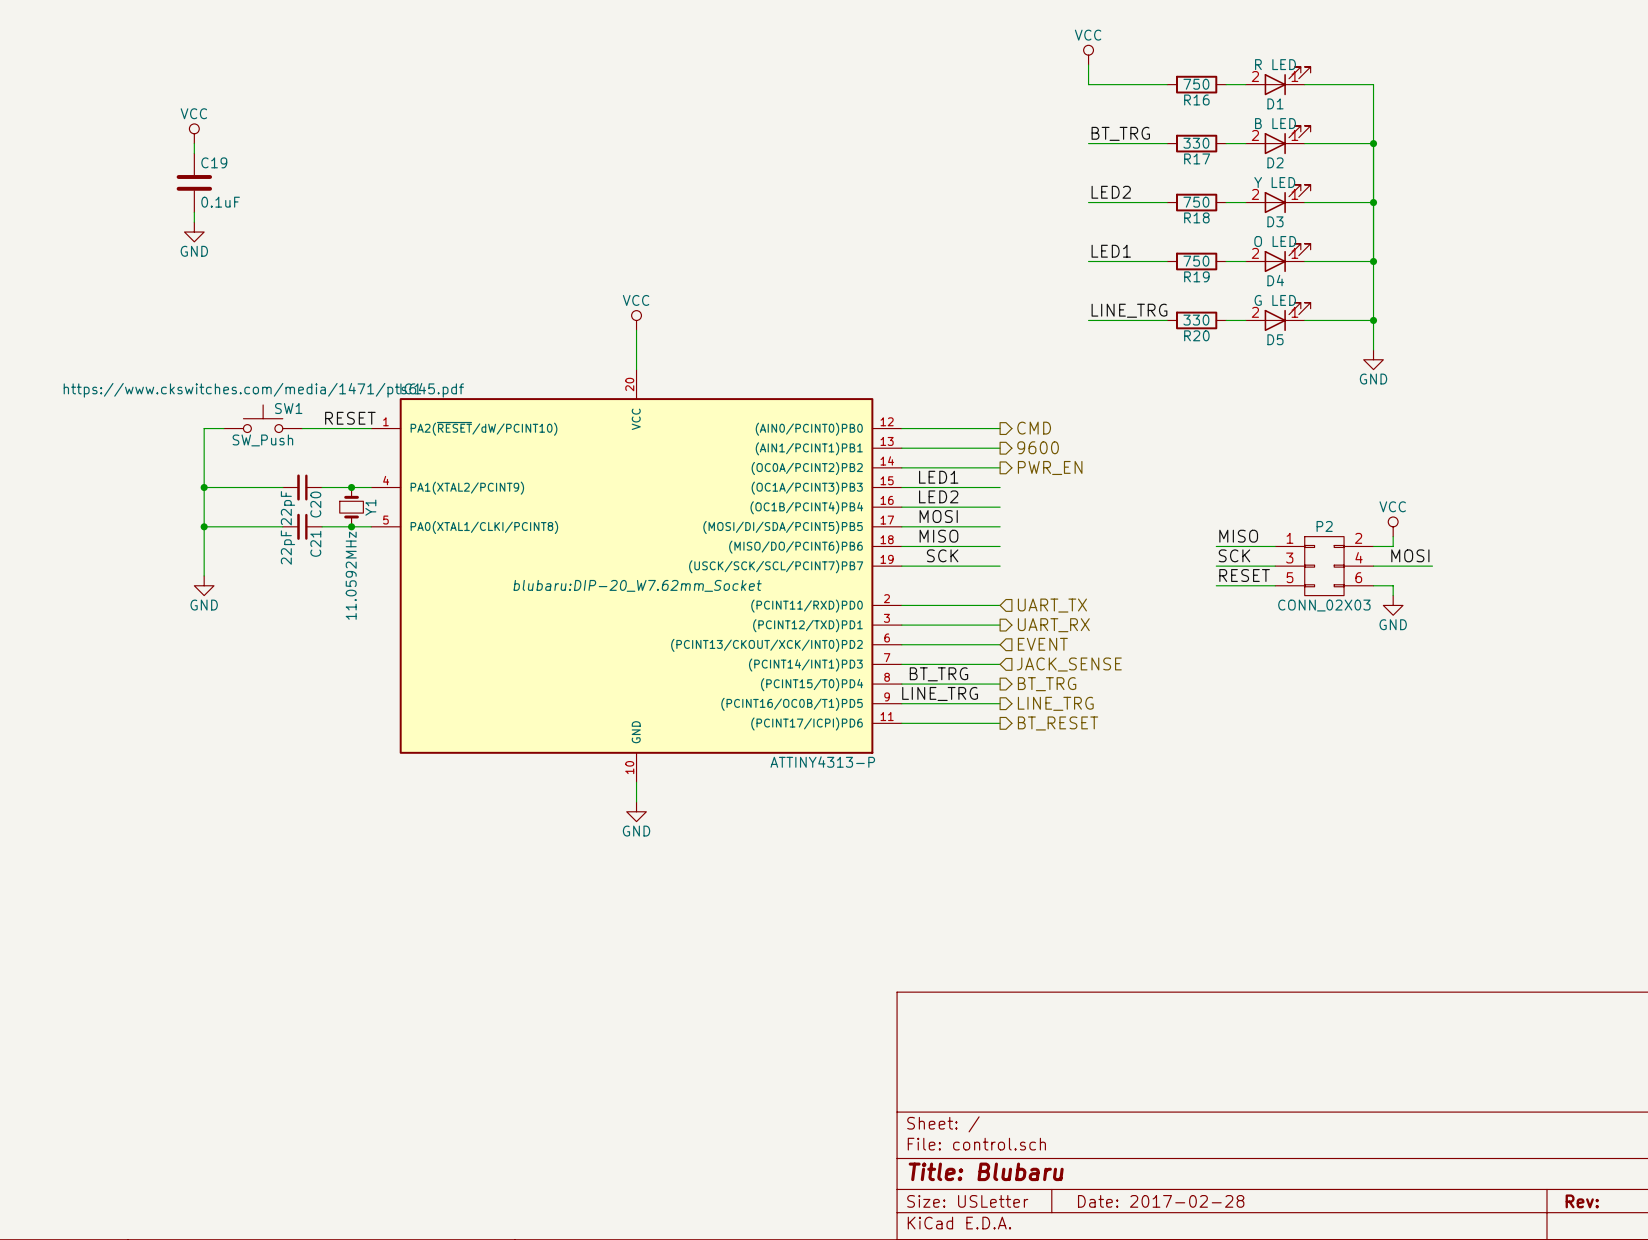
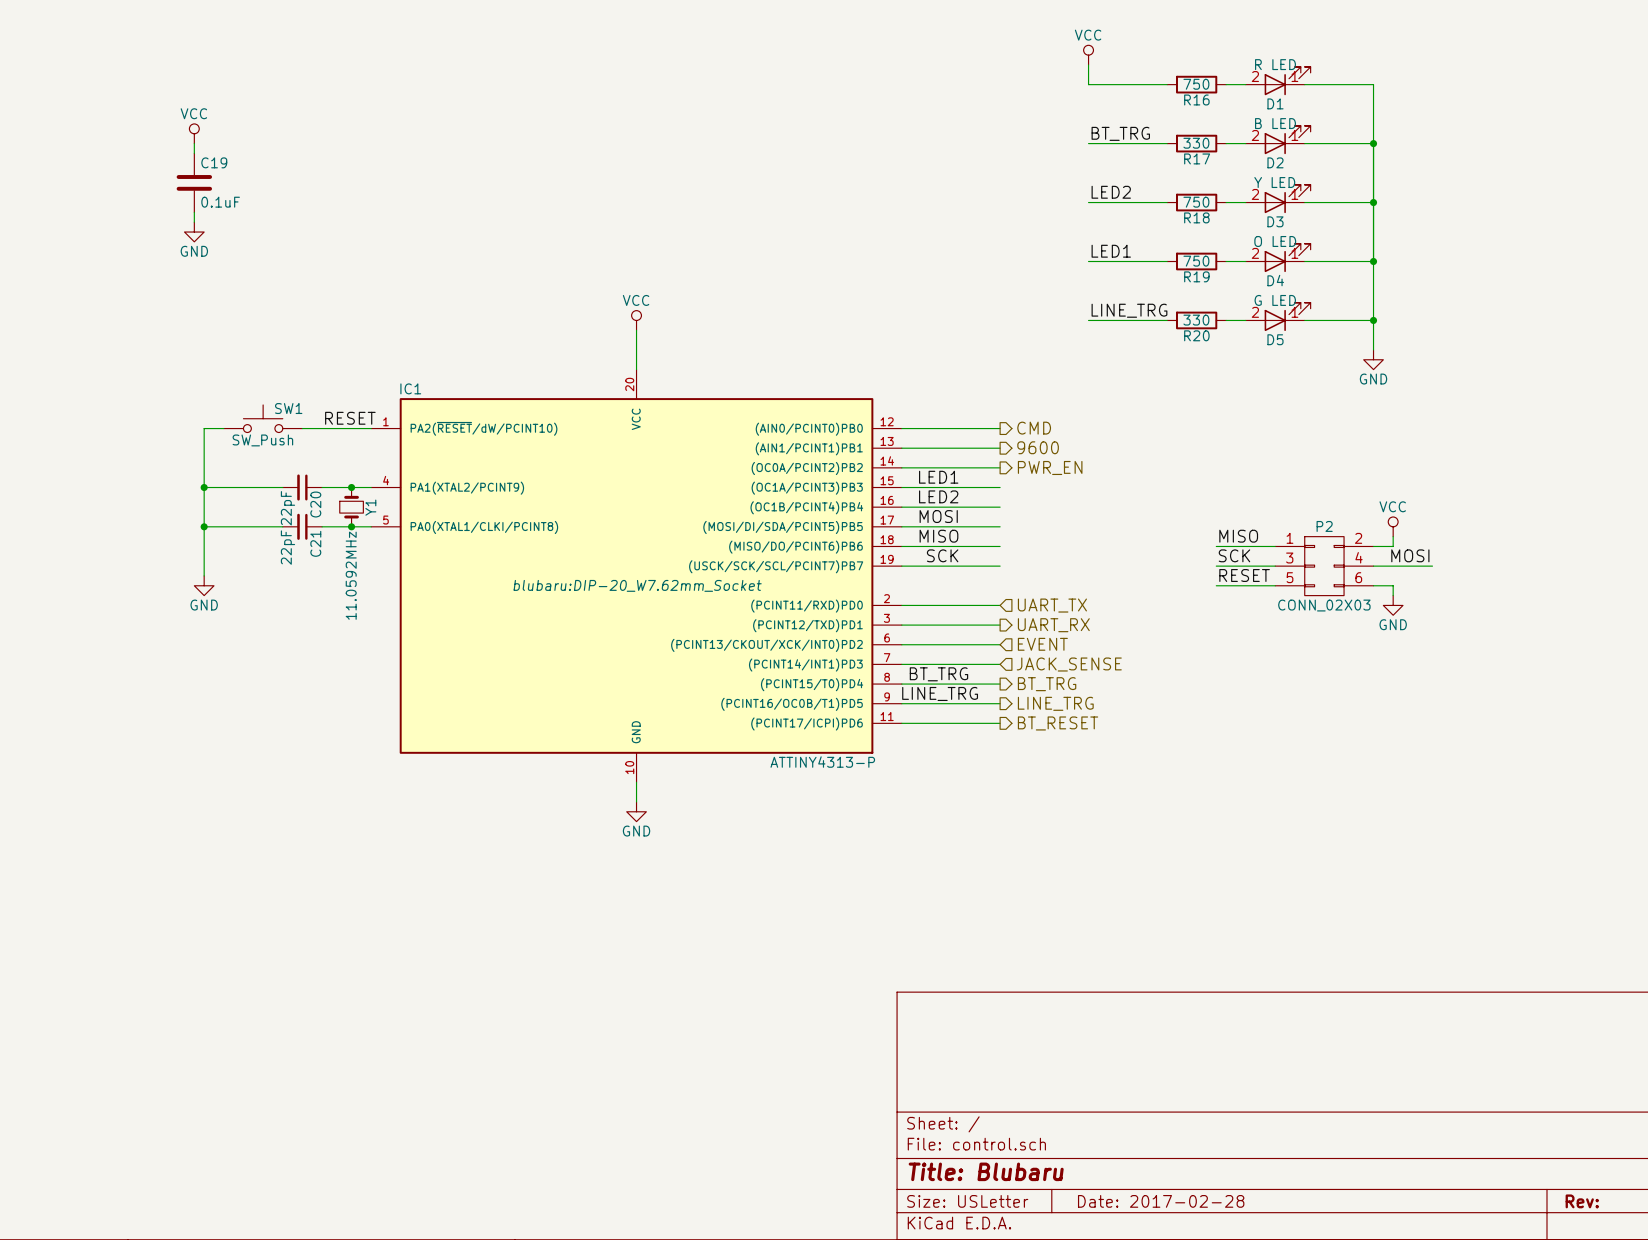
SW1 text: https://www.ckswitches.com/media/1471/pts645.pdf (263, 390) -> none

